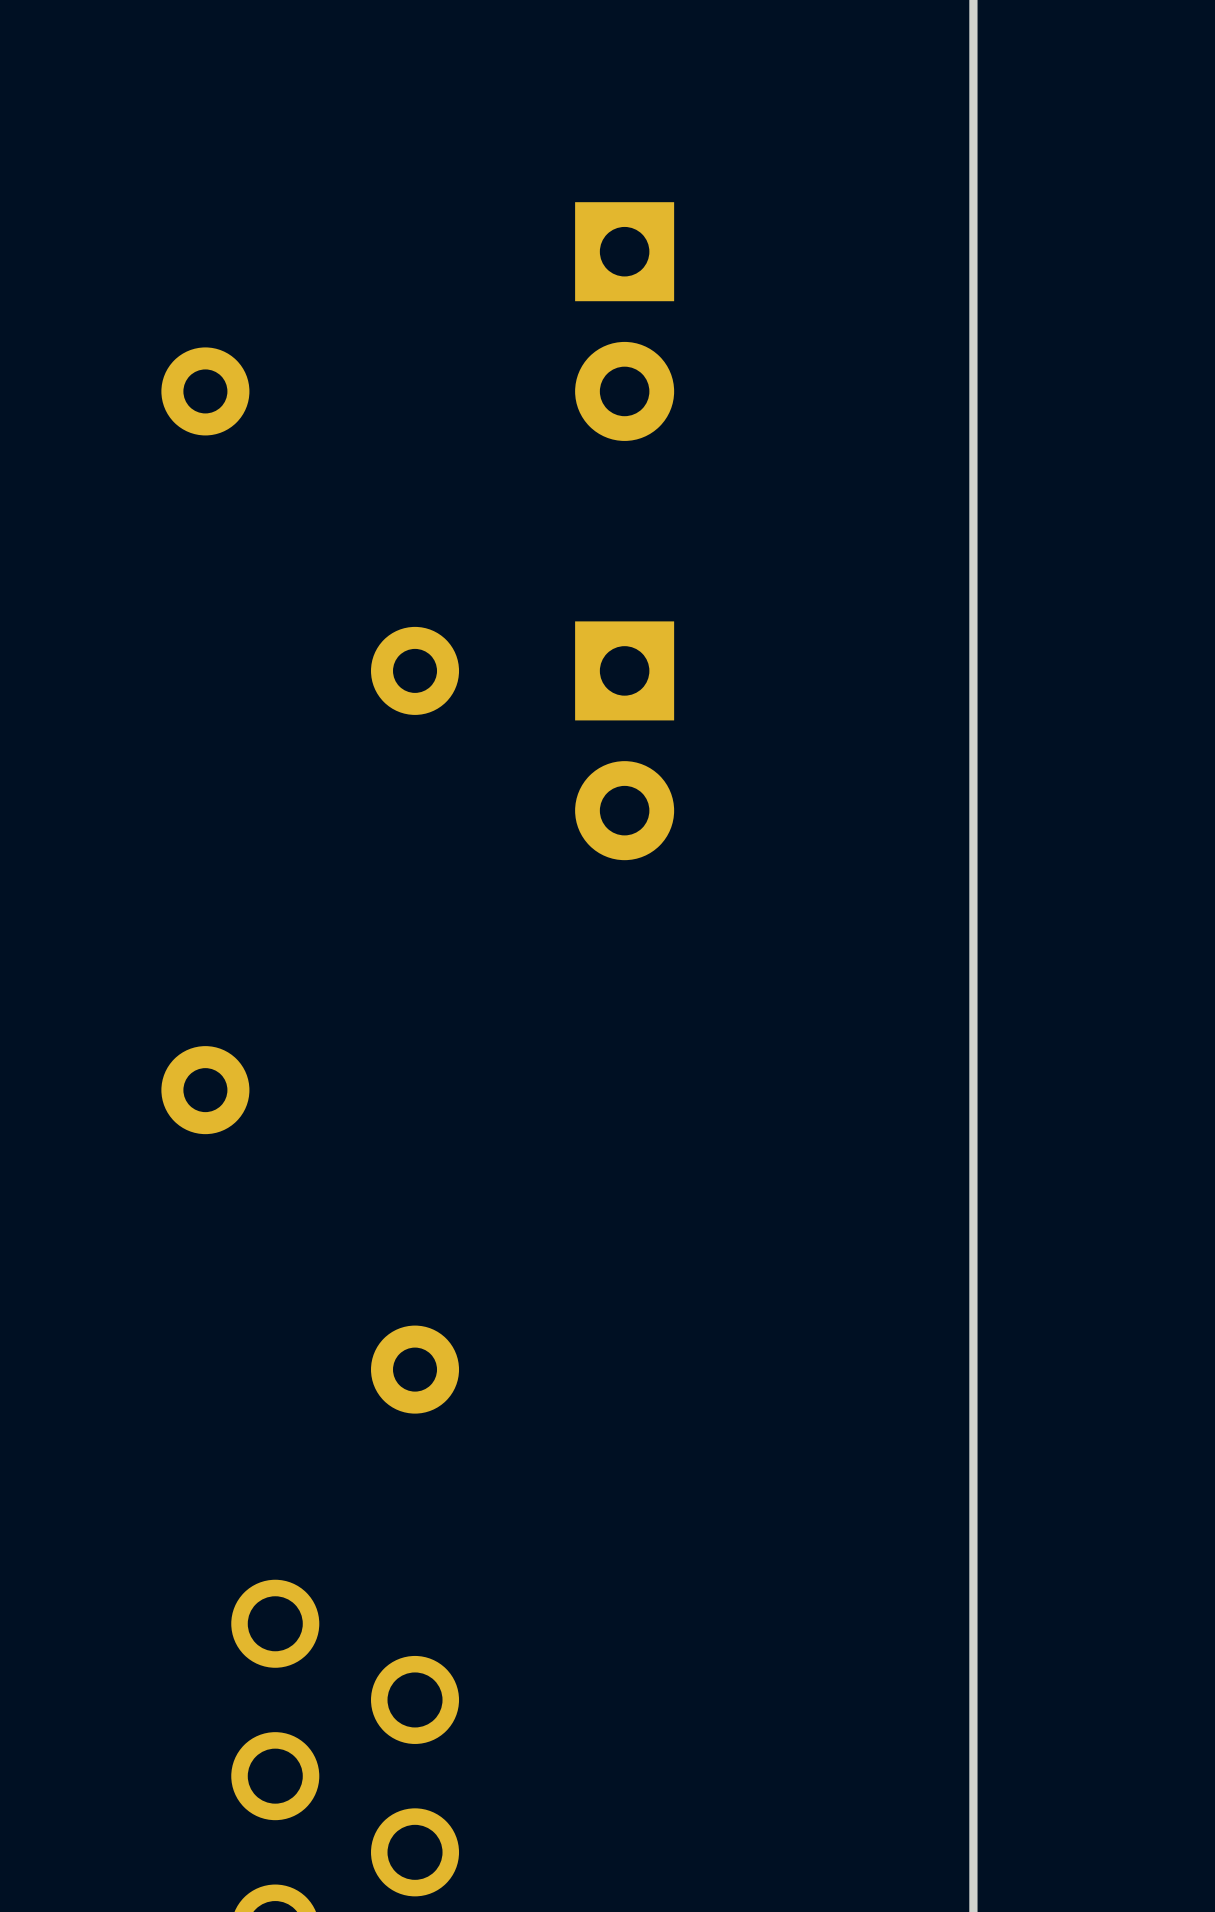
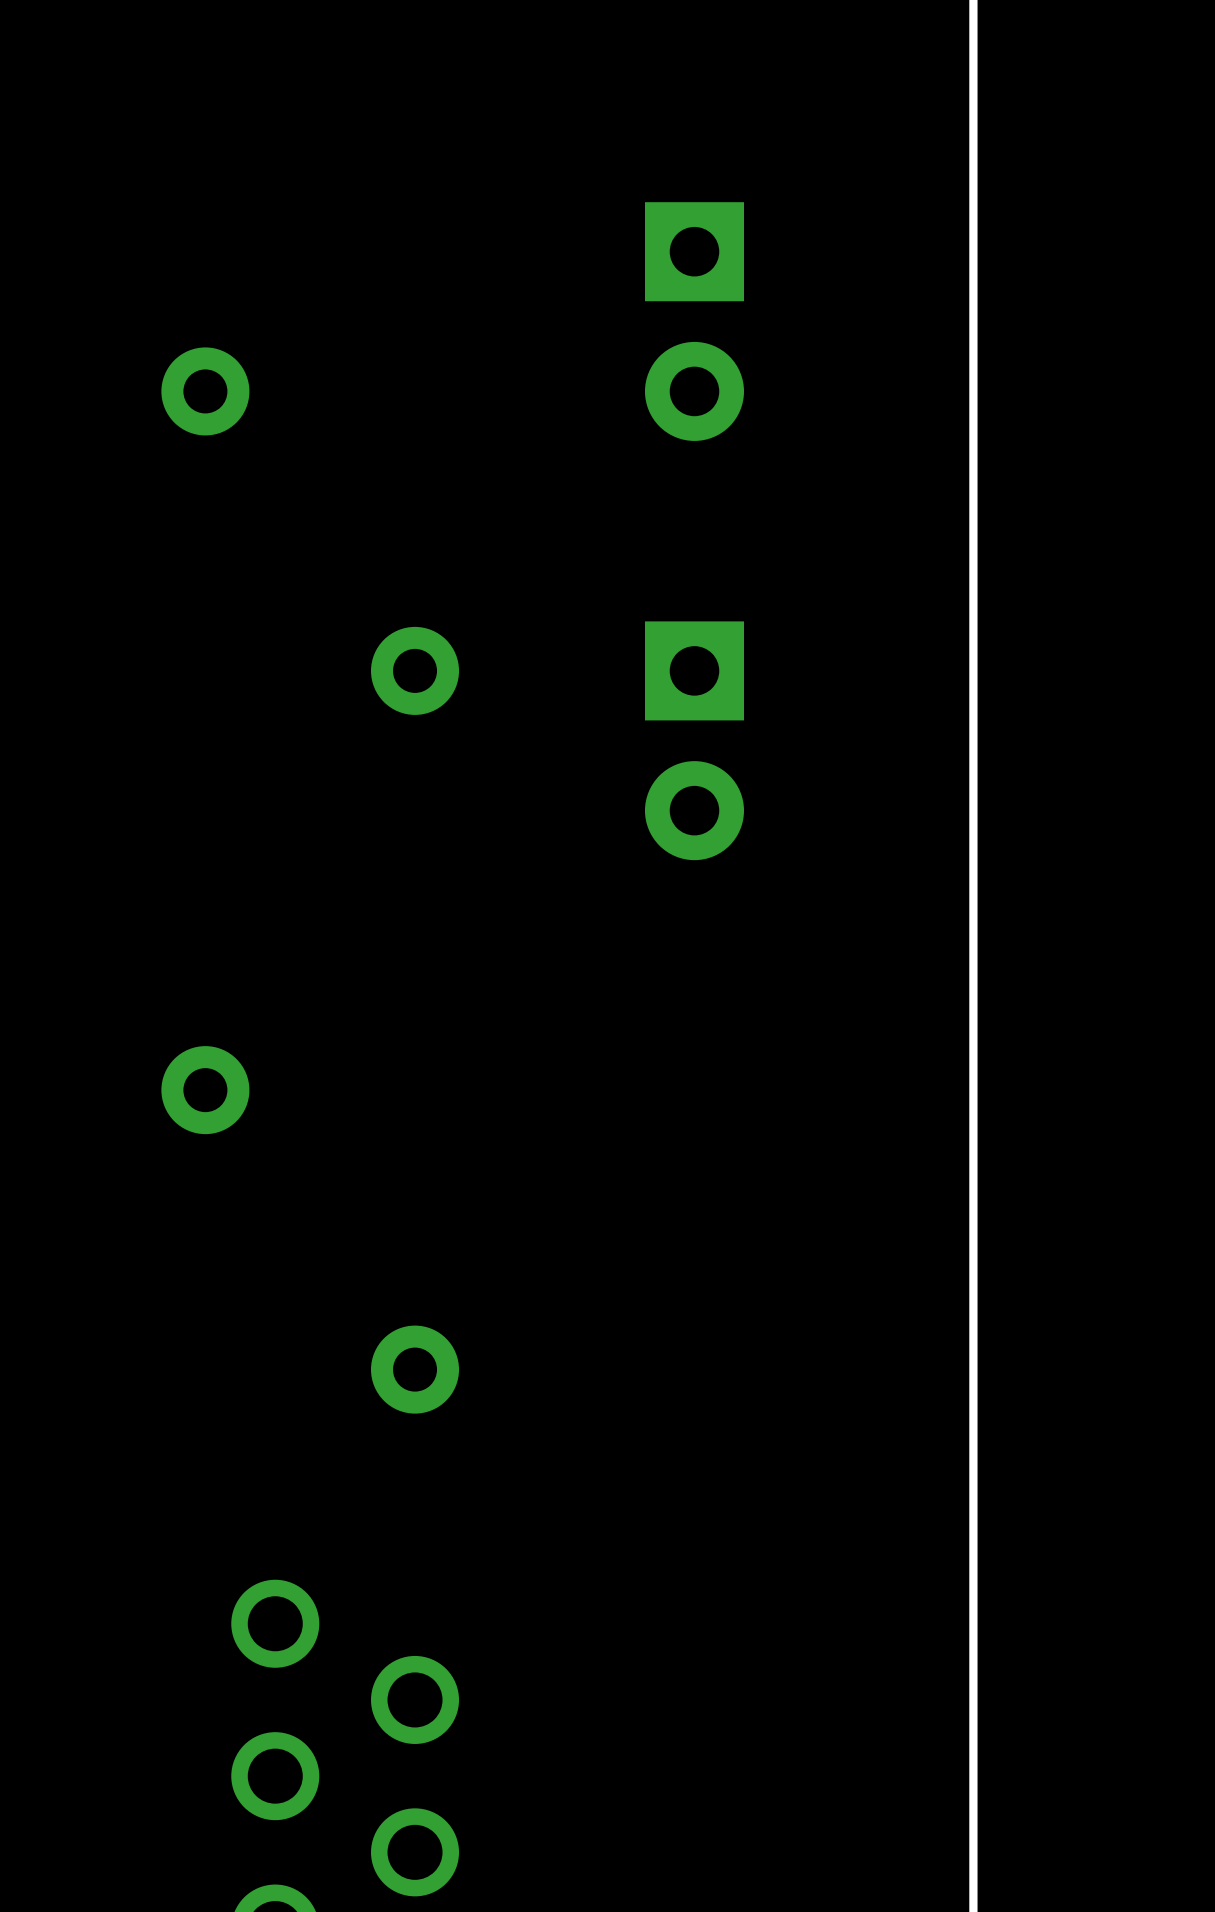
part position: (624, 321) -> (694, 321)
part position: (624, 740) -> (694, 740)

